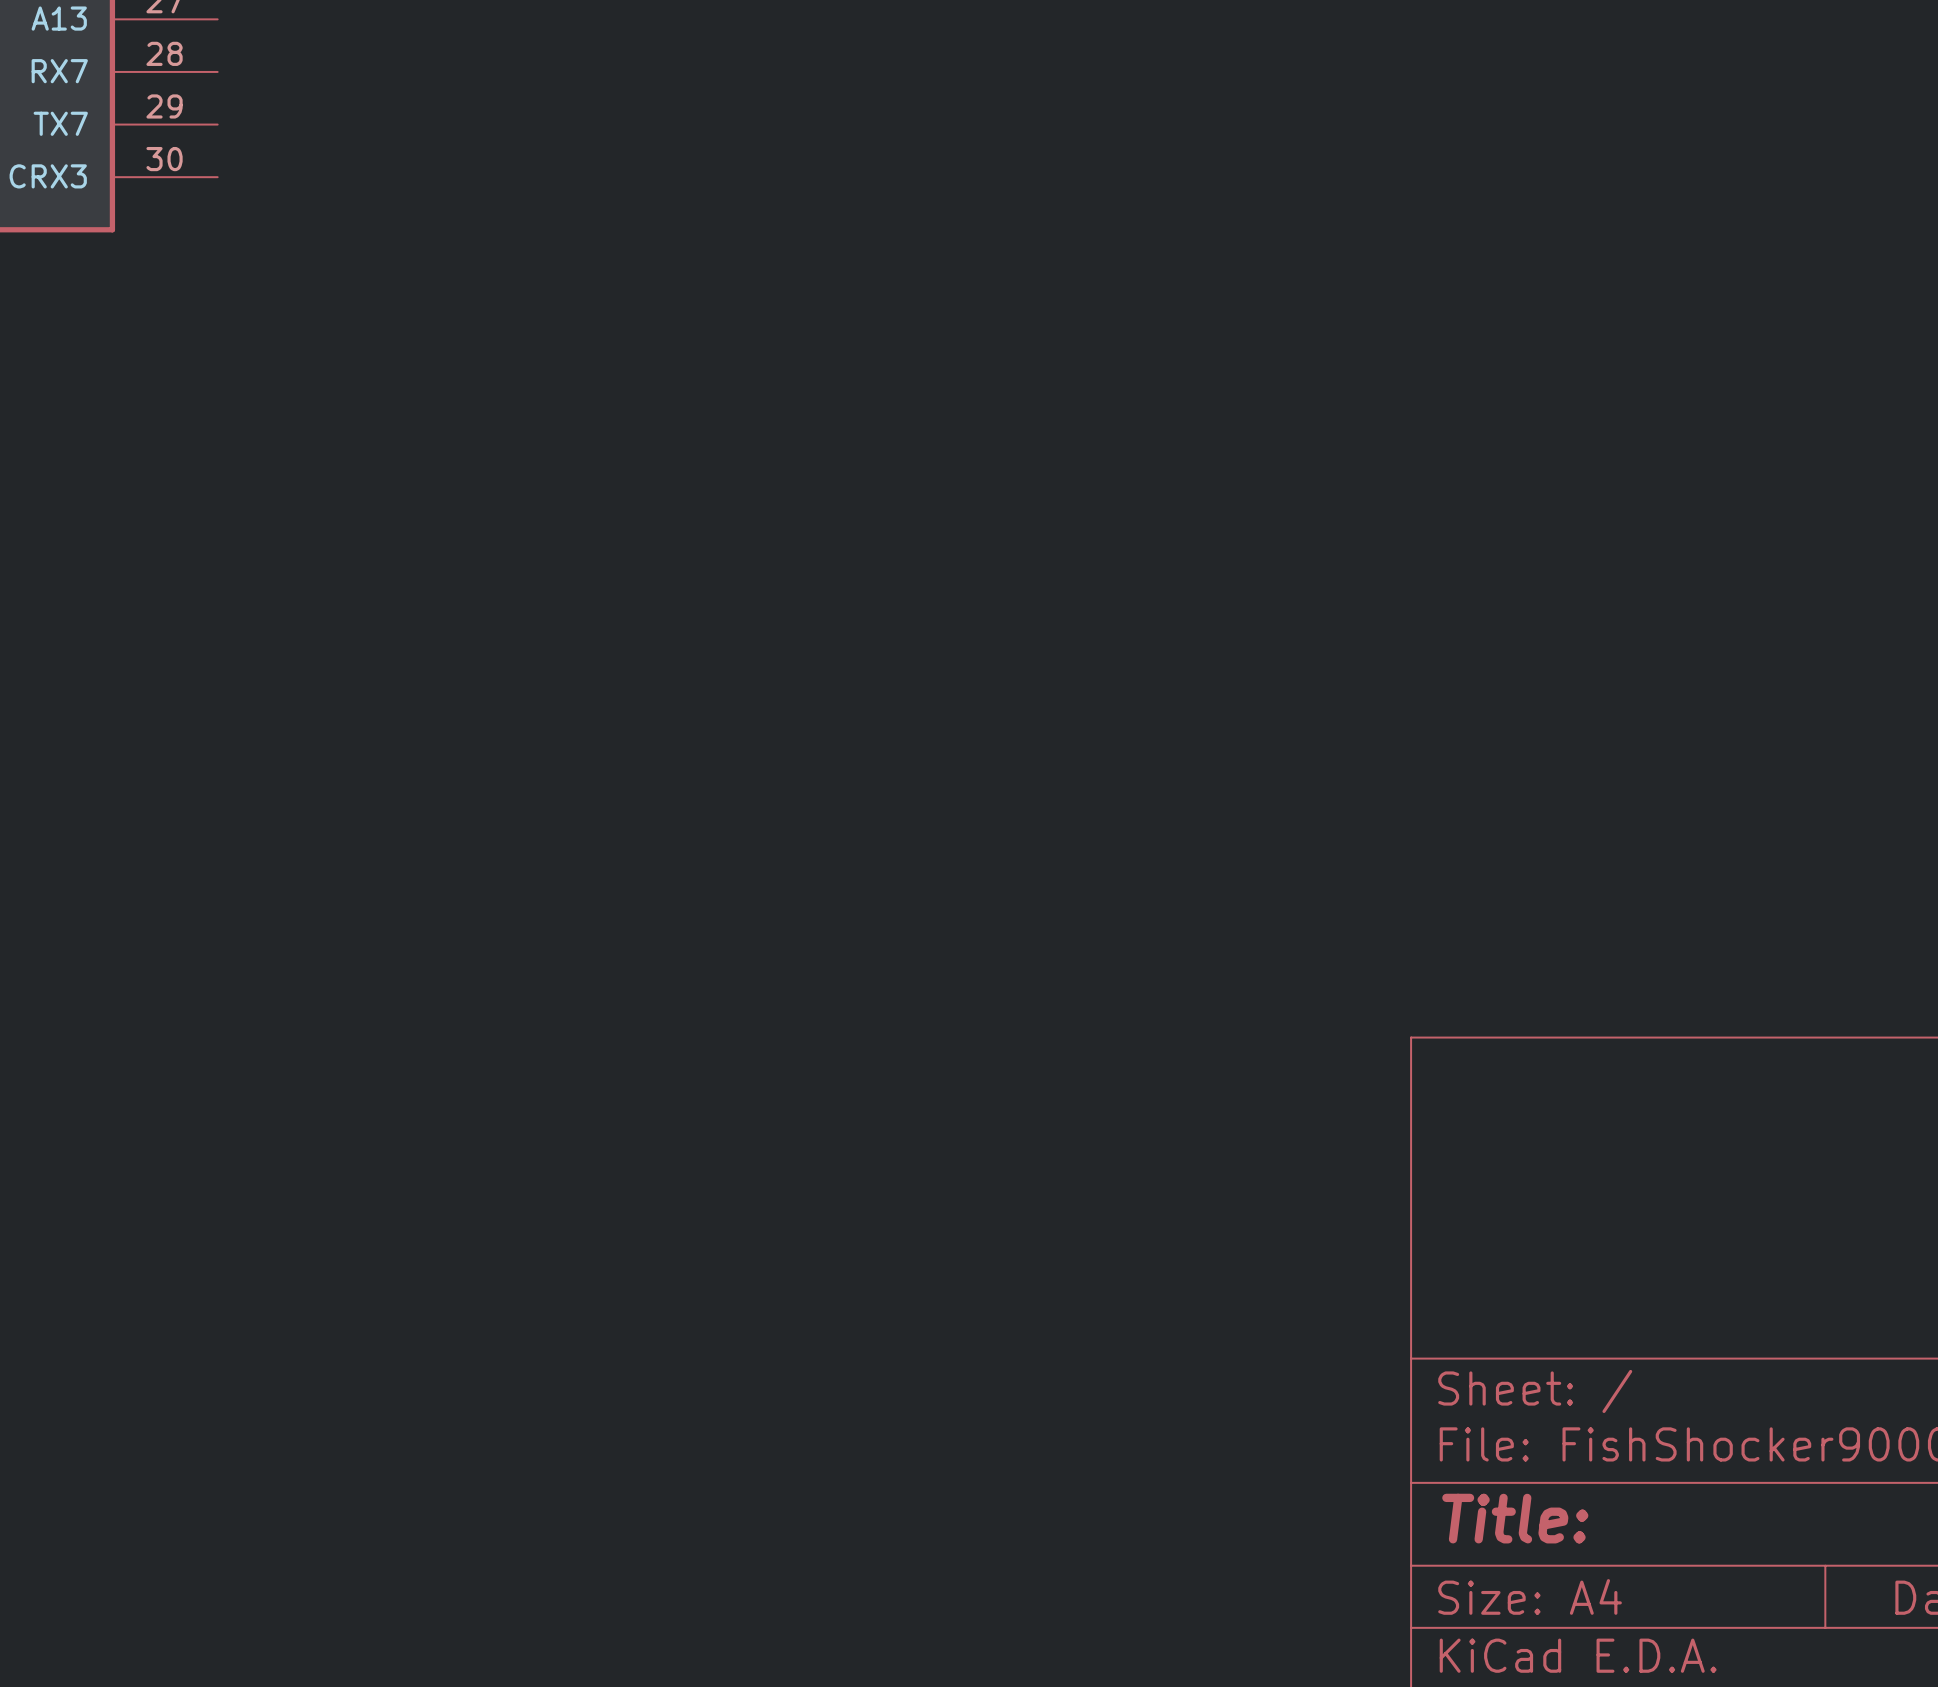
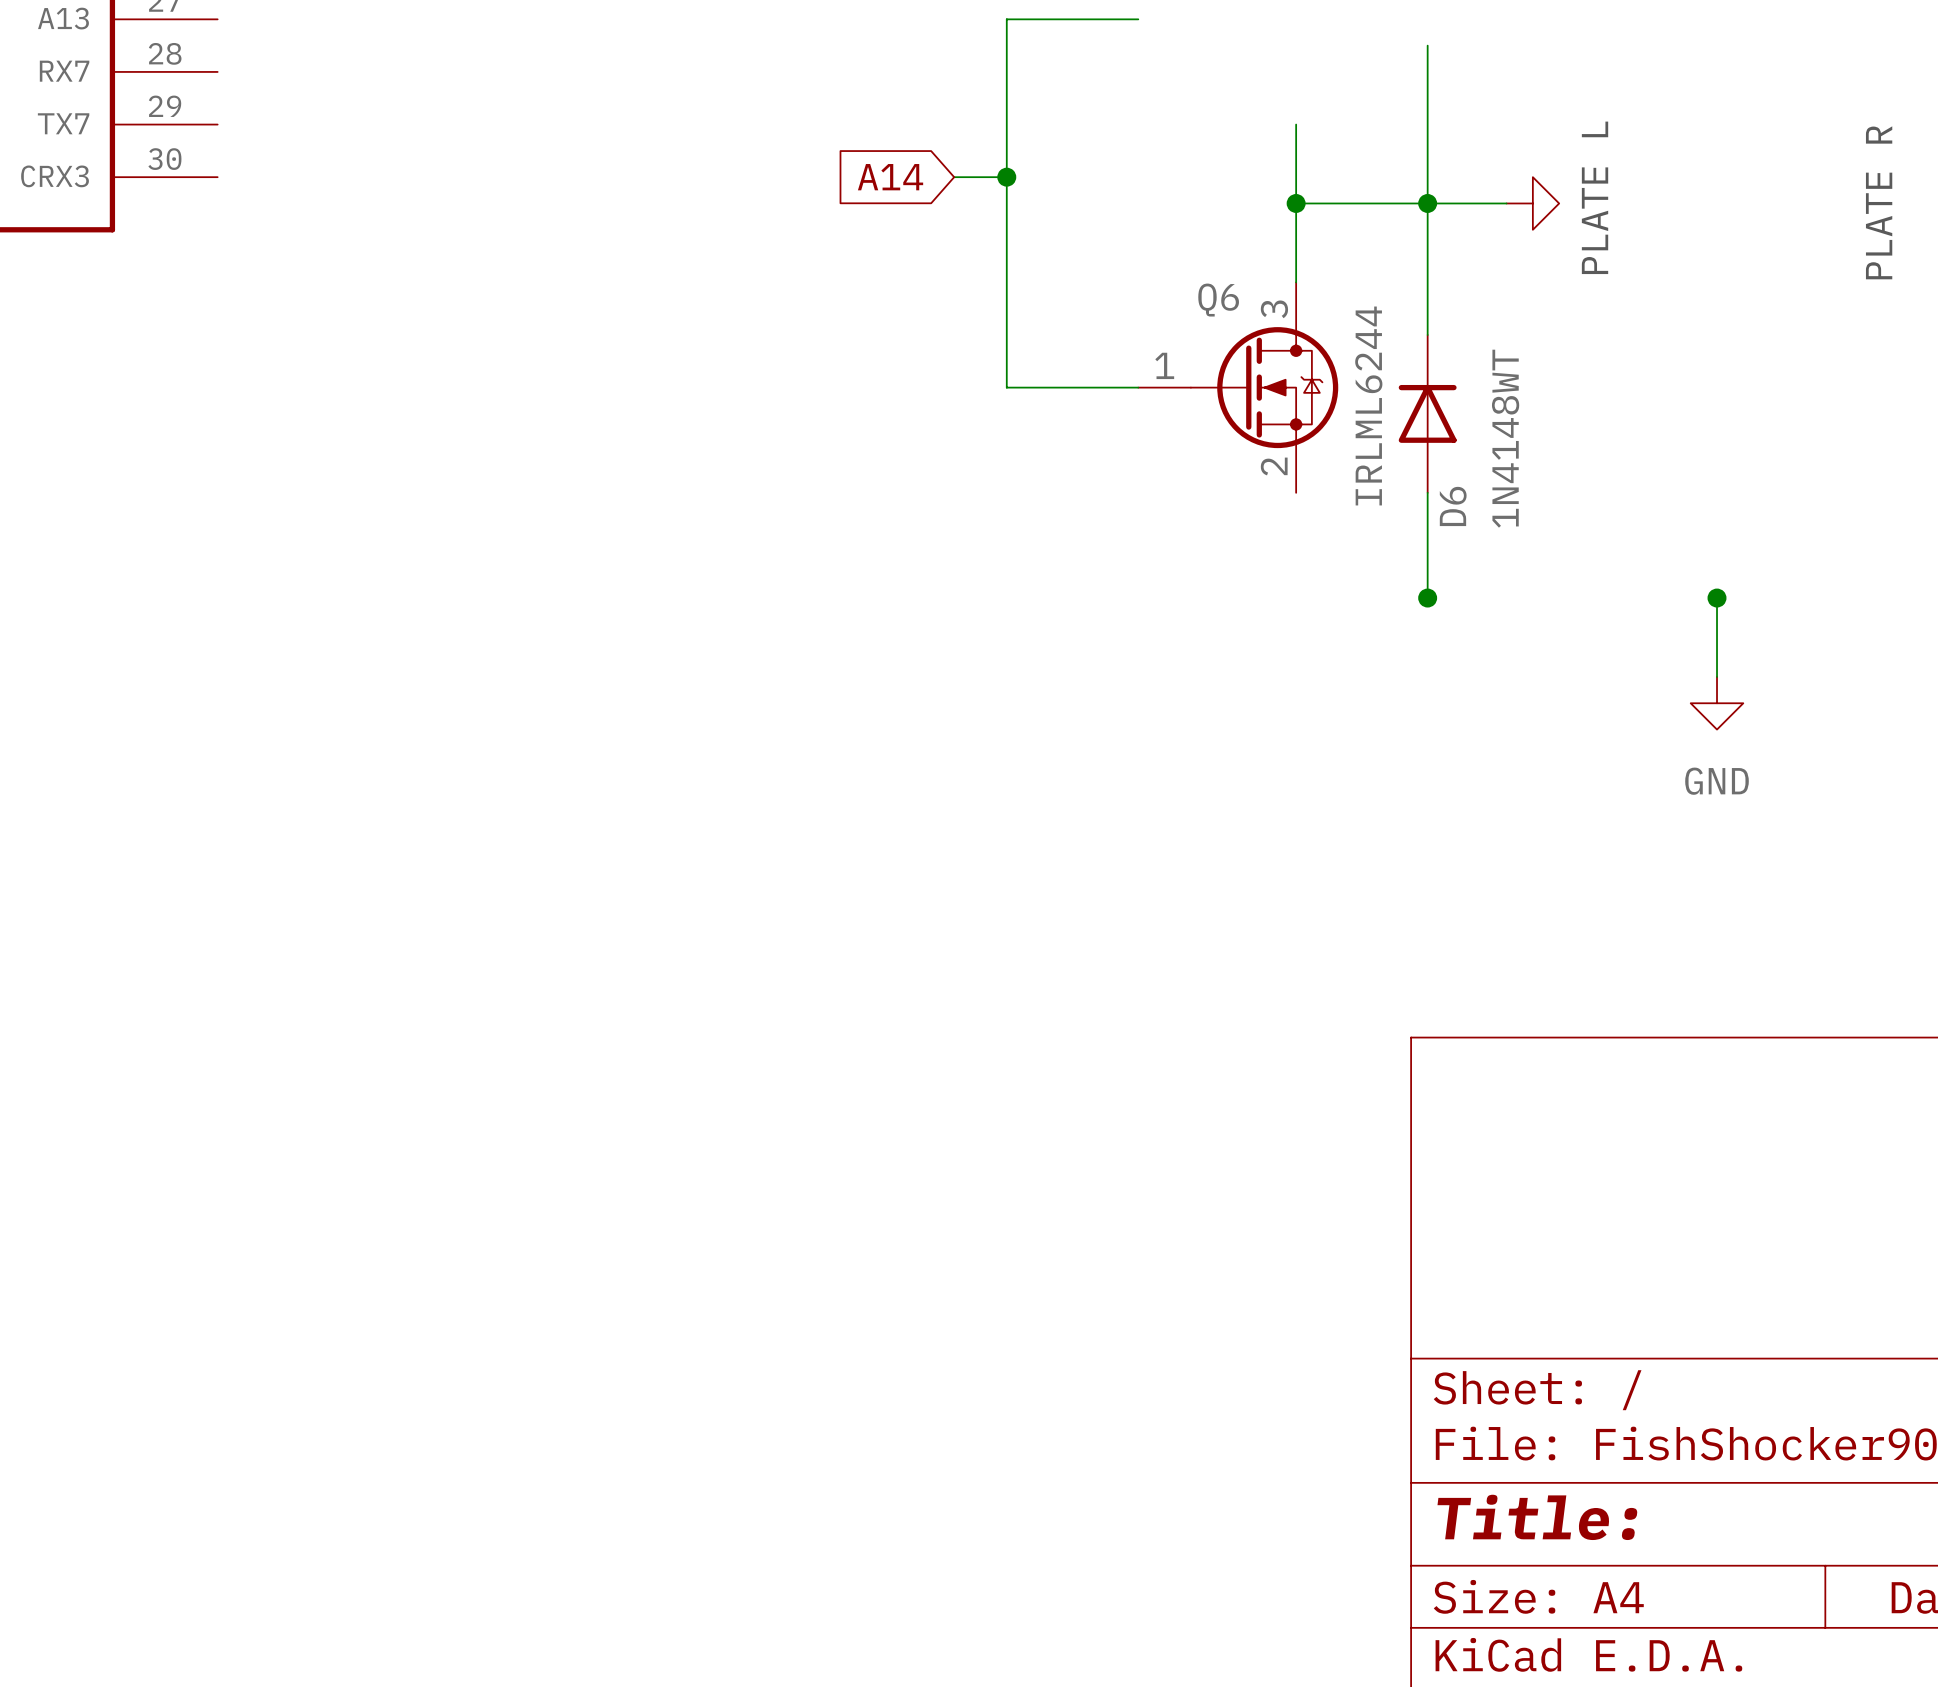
wire: none -> (1138, 19) (1006, 19) (1006, 387) (1138, 387)
wire: none -> (1427, 45) (1427, 335)
wire: none -> (1296, 124) (1296, 282)
global label: none -> A14 (890, 177)
wire: none -> (954, 177) (1006, 177)
junction: none -> (1006, 177)
text: none -> PLATE L (1595, 197)
text: none -> PLATE R (1879, 202)
wire: none -> (1296, 203) (1506, 203)
junction: none -> (1296, 203)
junction: none -> (1427, 203)
power symbol: none -> (1532, 203)
Q6: none -> IRLML6244 (1238, 387)
D6: none -> 1N4148WT (1427, 413)
wire: none -> (1427, 492) (1427, 598)
junction: none -> (1427, 598)
wire: none -> (1717, 598) (1717, 676)
junction: none -> (1717, 598)
power symbol: none -> GND (1717, 703)

